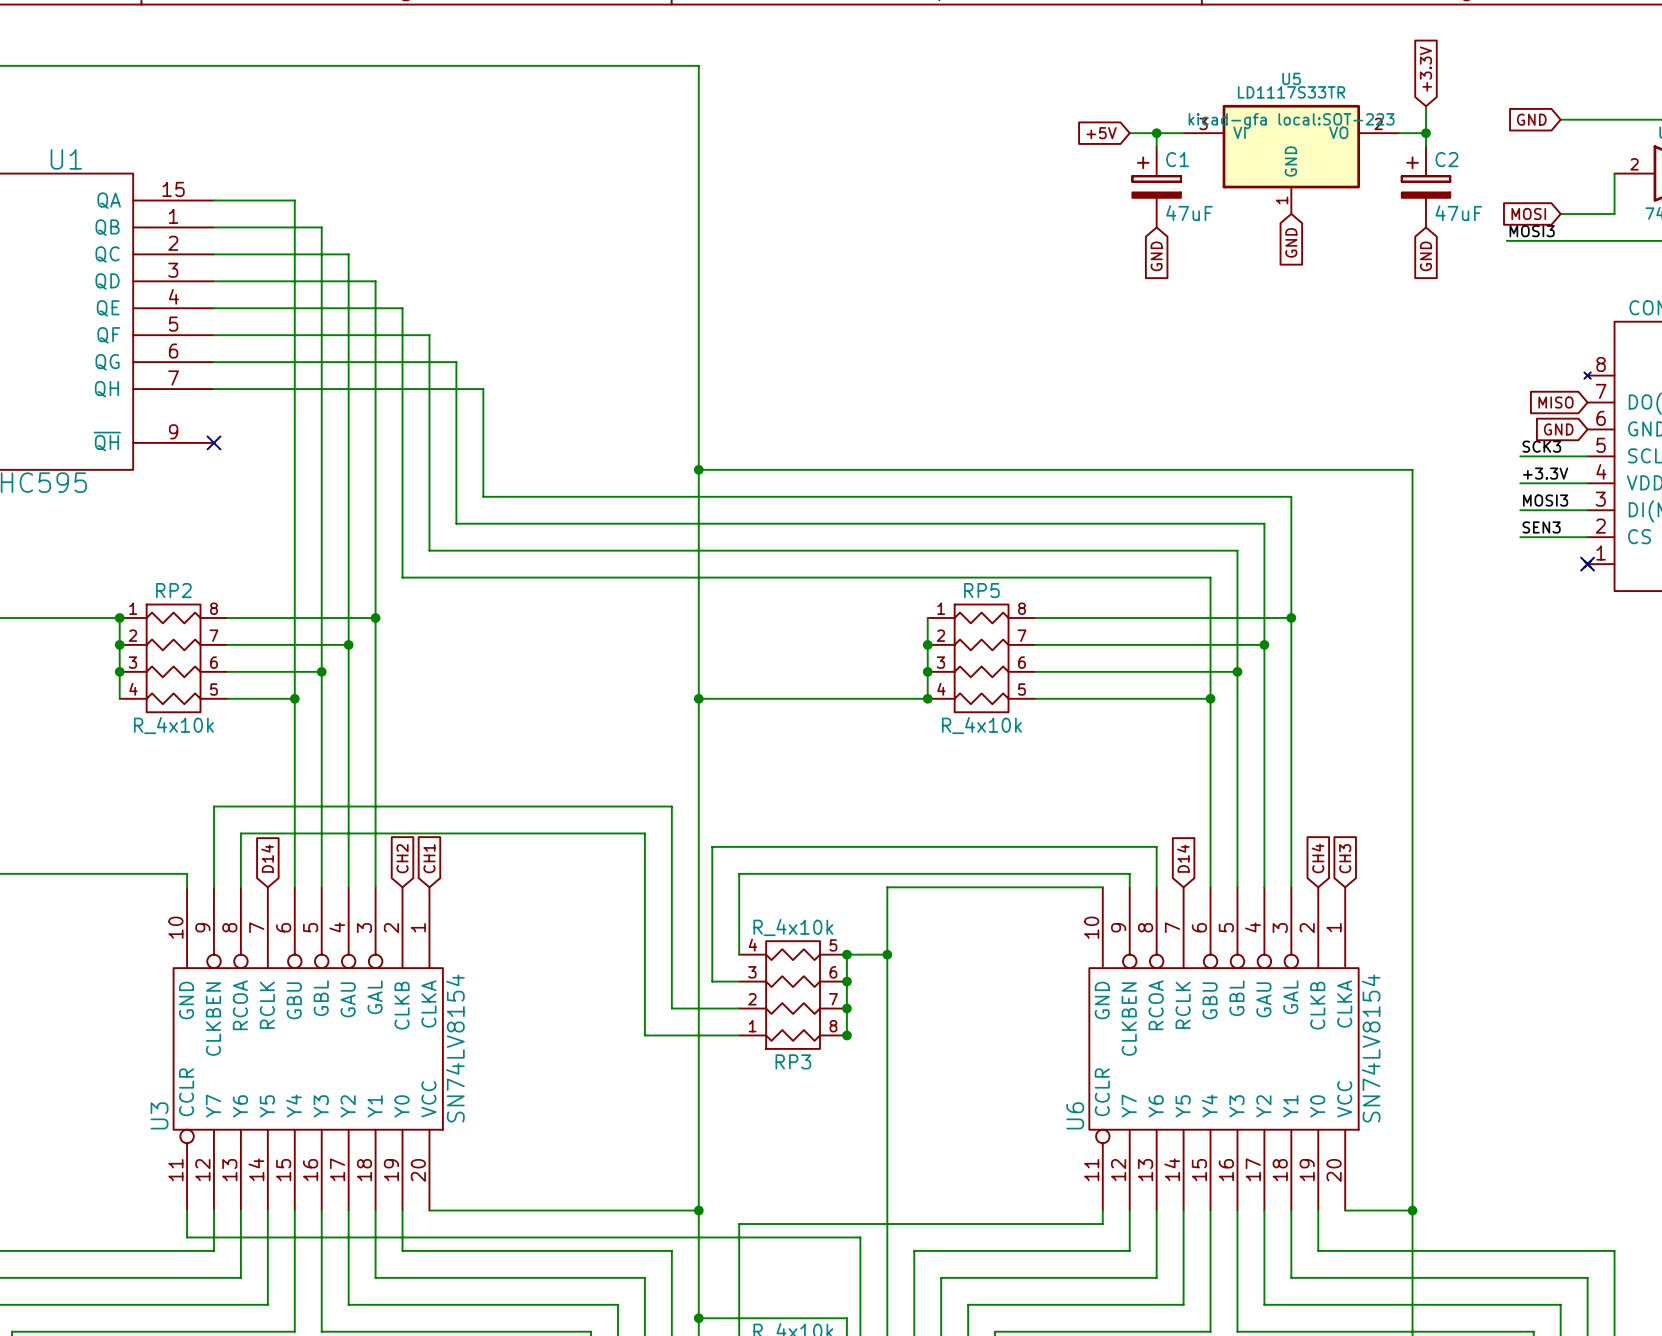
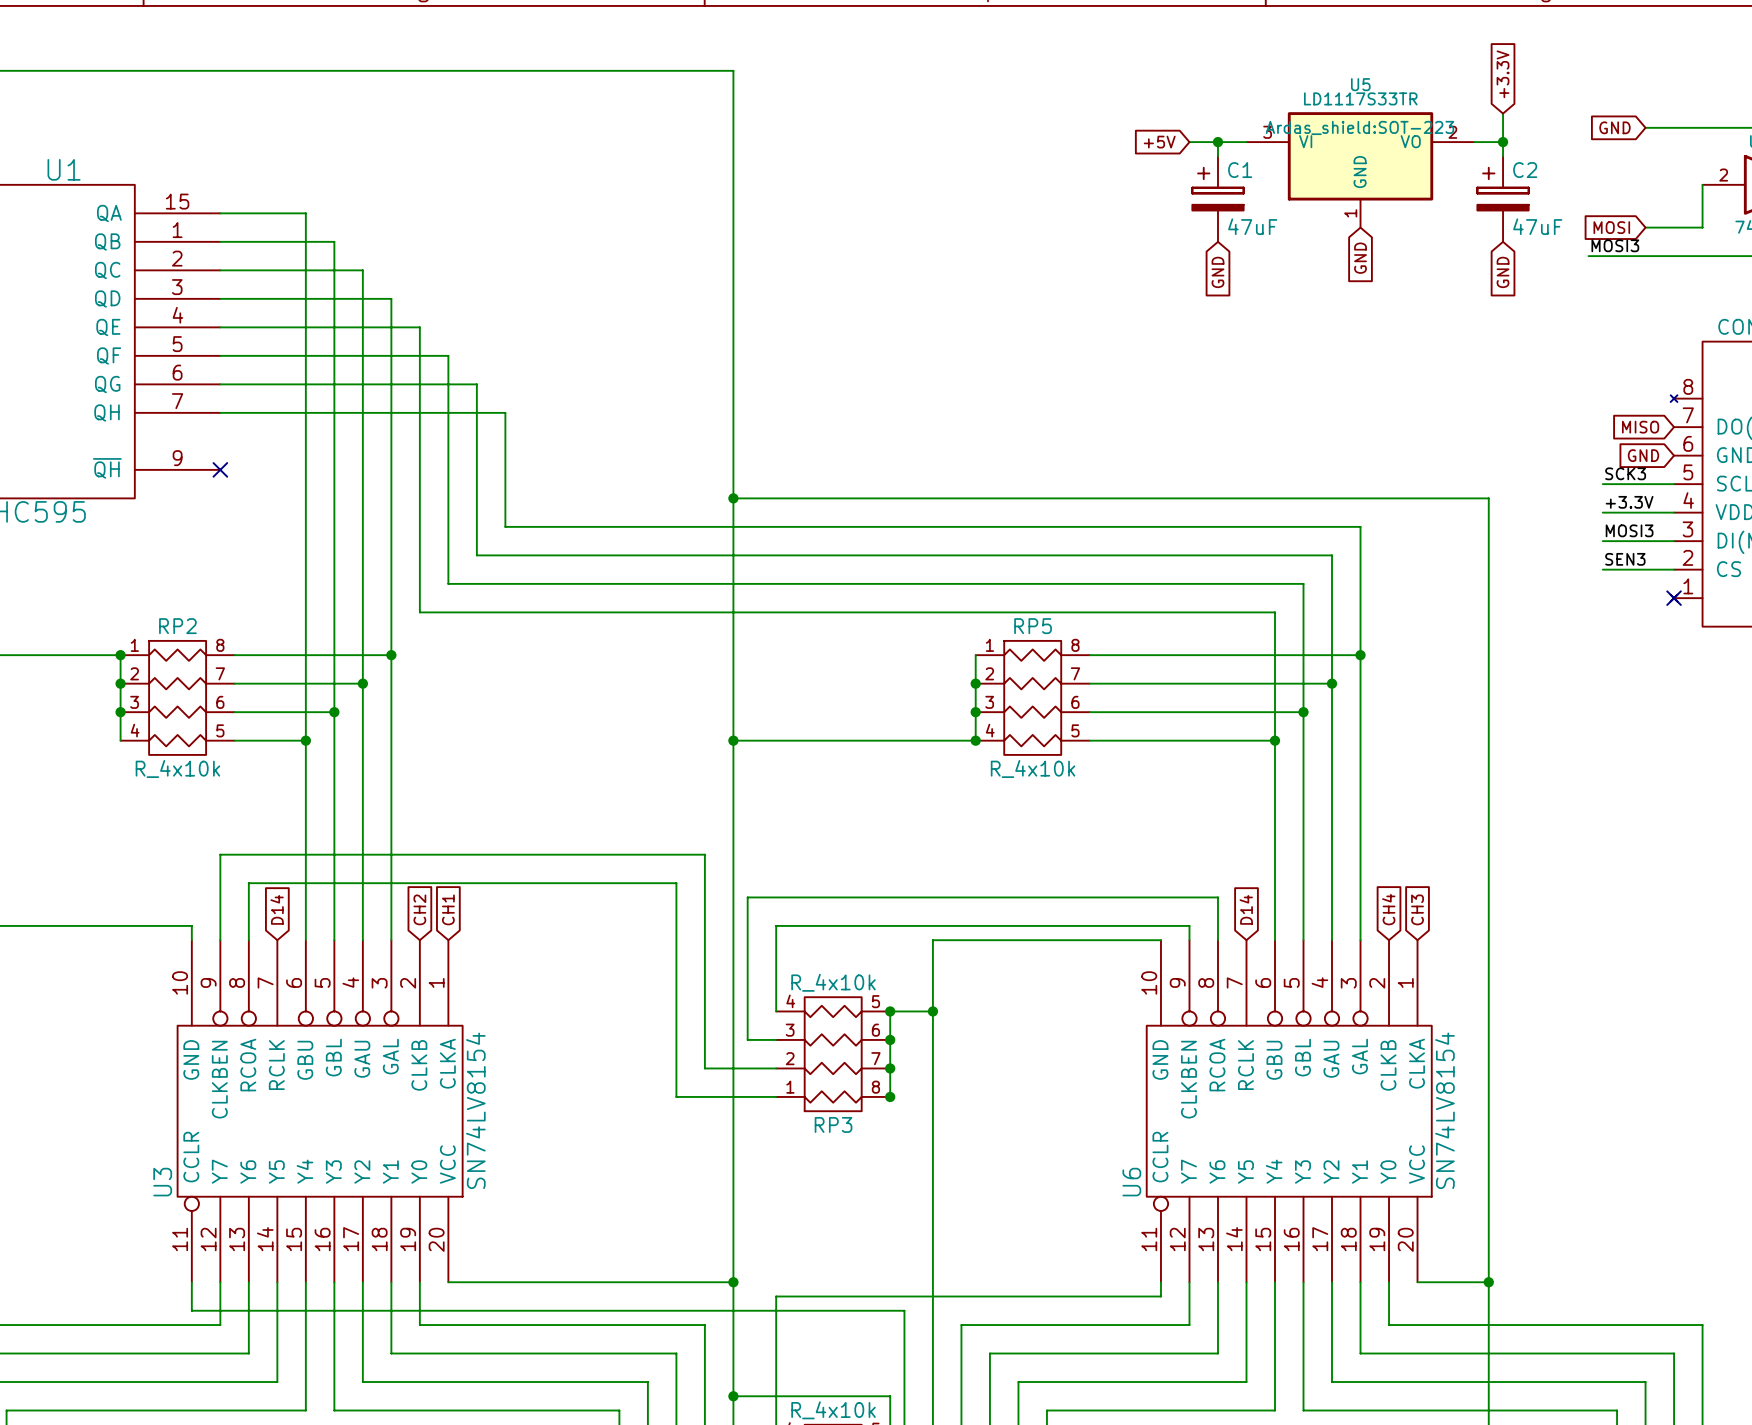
U5 text: kicad-gfa local:SOT-223 (1291, 121) -> Ardas_shield:SOT-223 (1359, 127)

